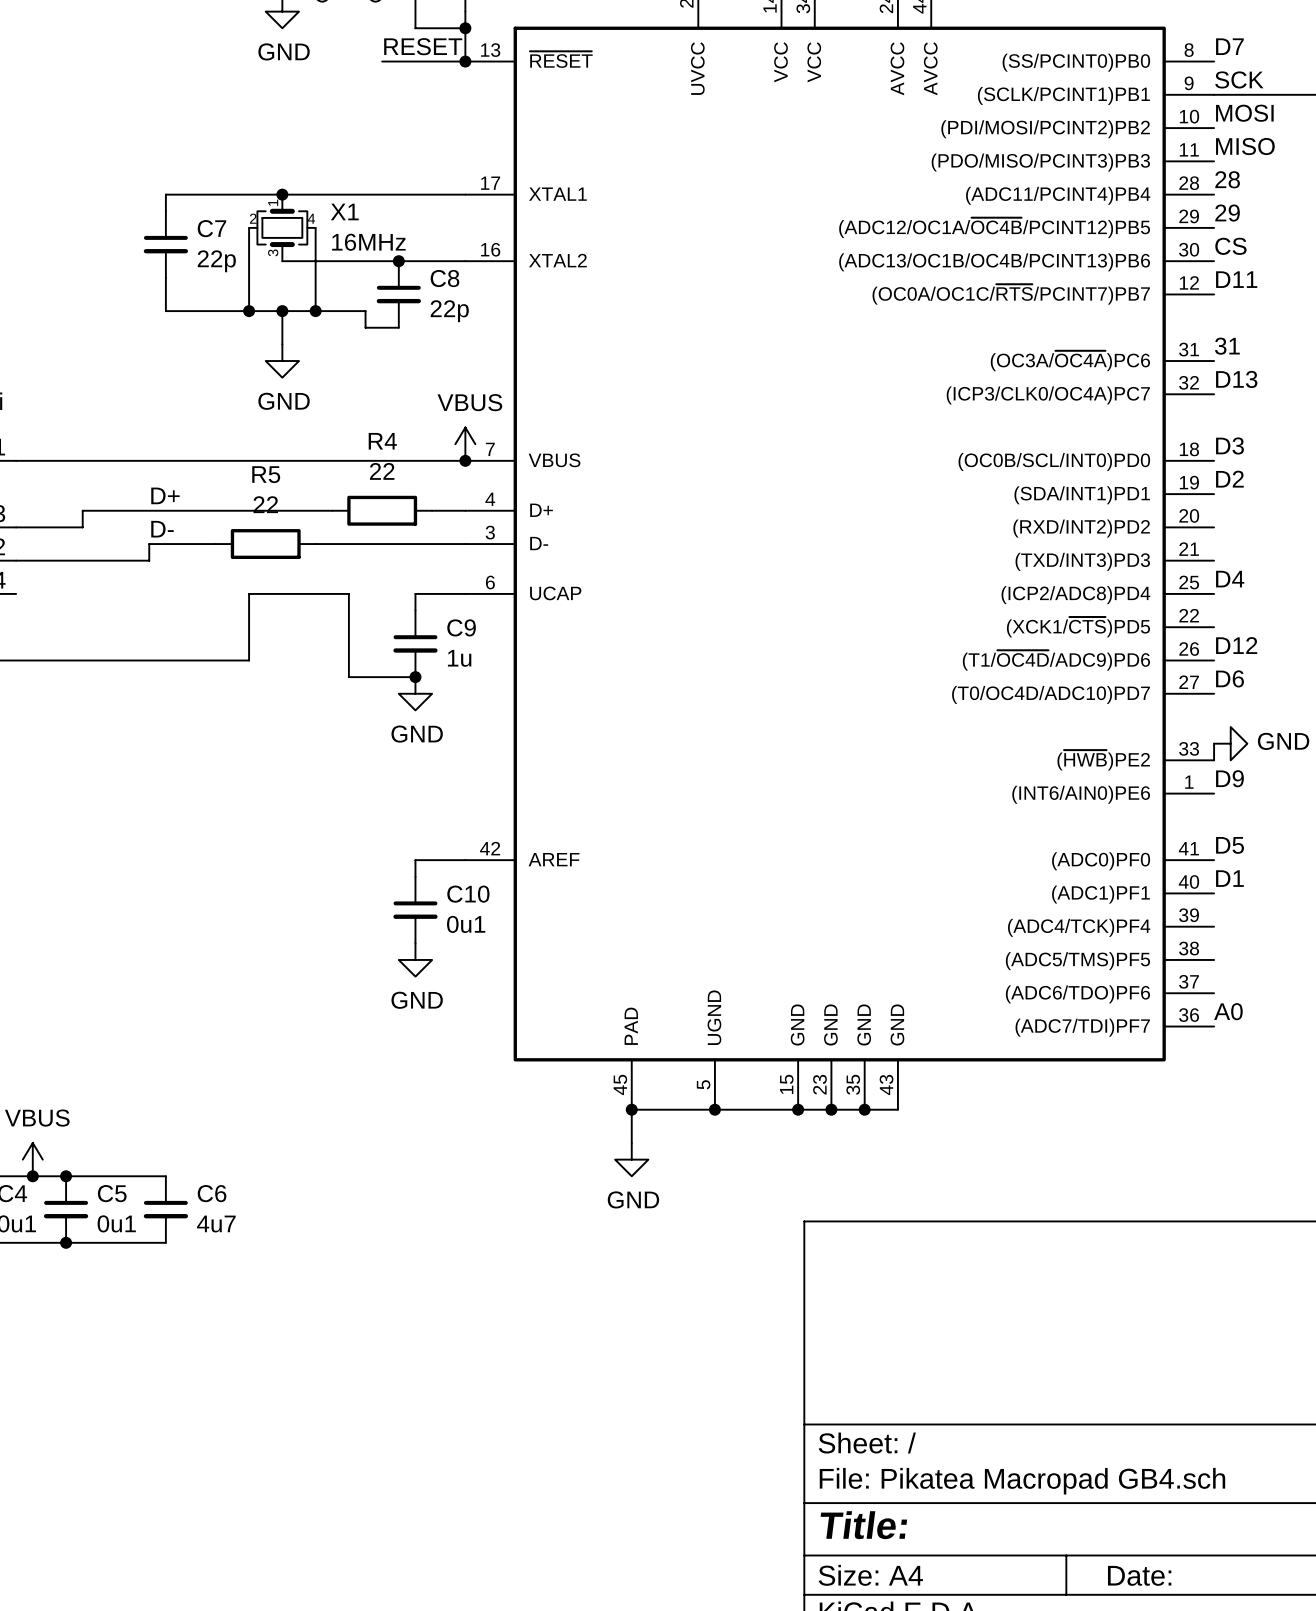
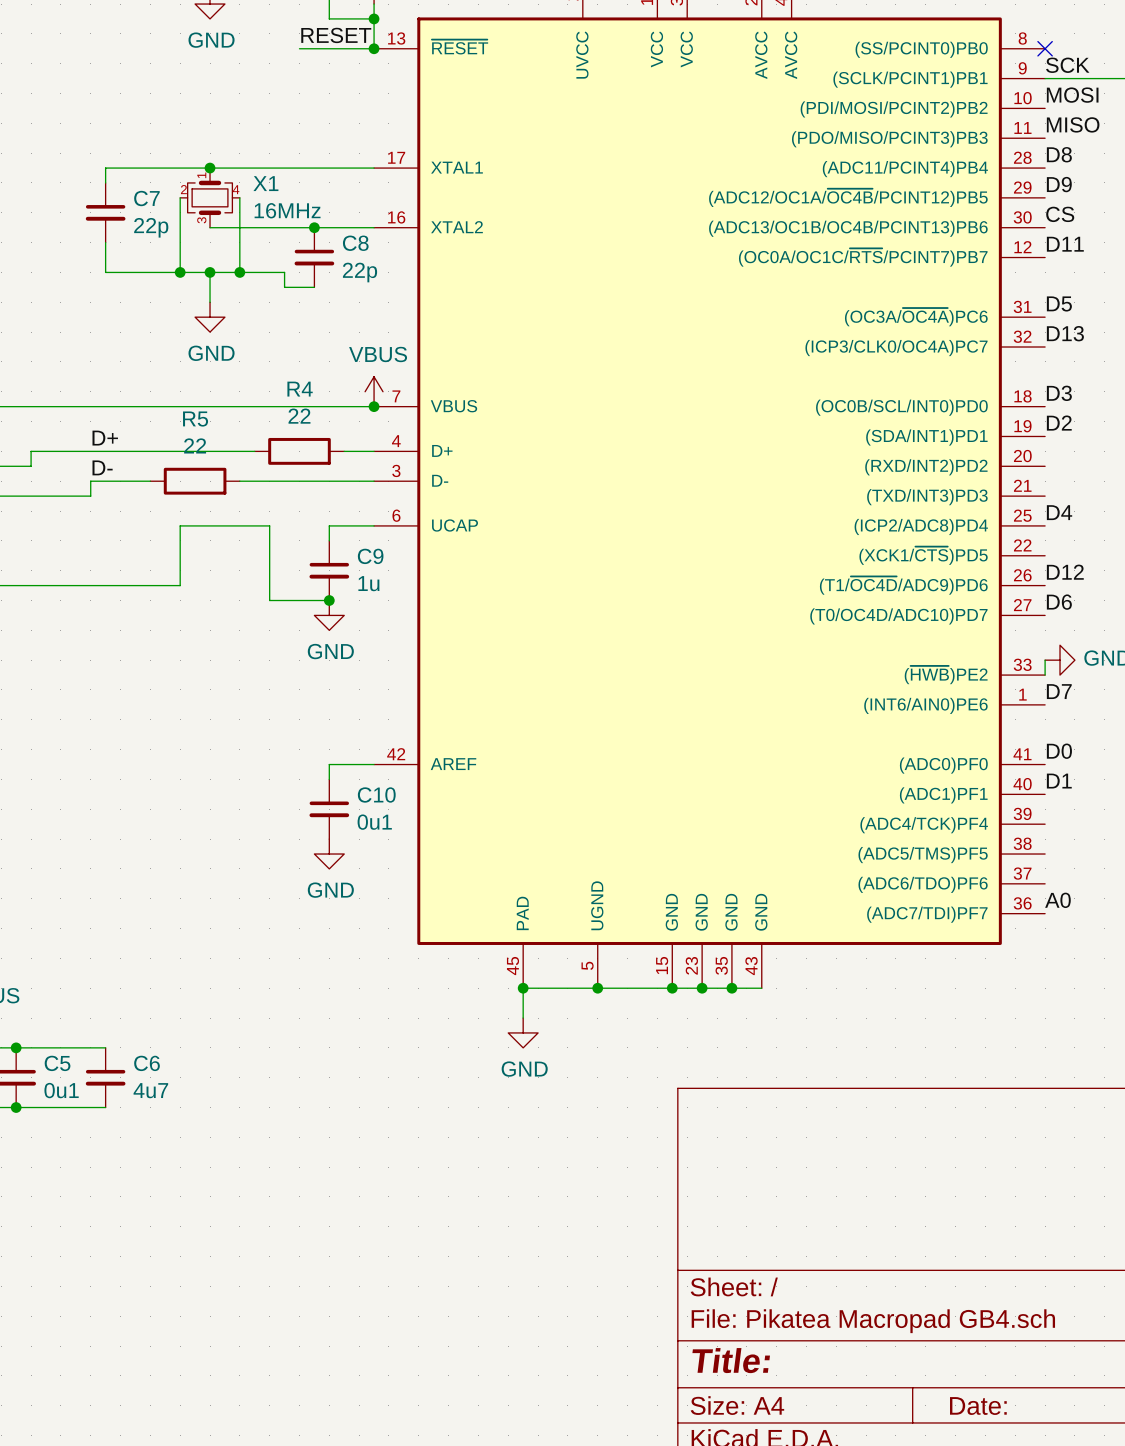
label: D7 (1229, 46) -> none
no-connect mark: none -> (1045, 48)
label: 28 (1227, 179) -> D8 (1059, 154)
label: 29 (1227, 213) -> D9 (1059, 184)
label: 31 (1227, 346) -> D5 (1059, 303)
label: D9 (1229, 778) -> D7 (1059, 691)
label: D5 (1230, 845) -> D0 (1059, 751)

